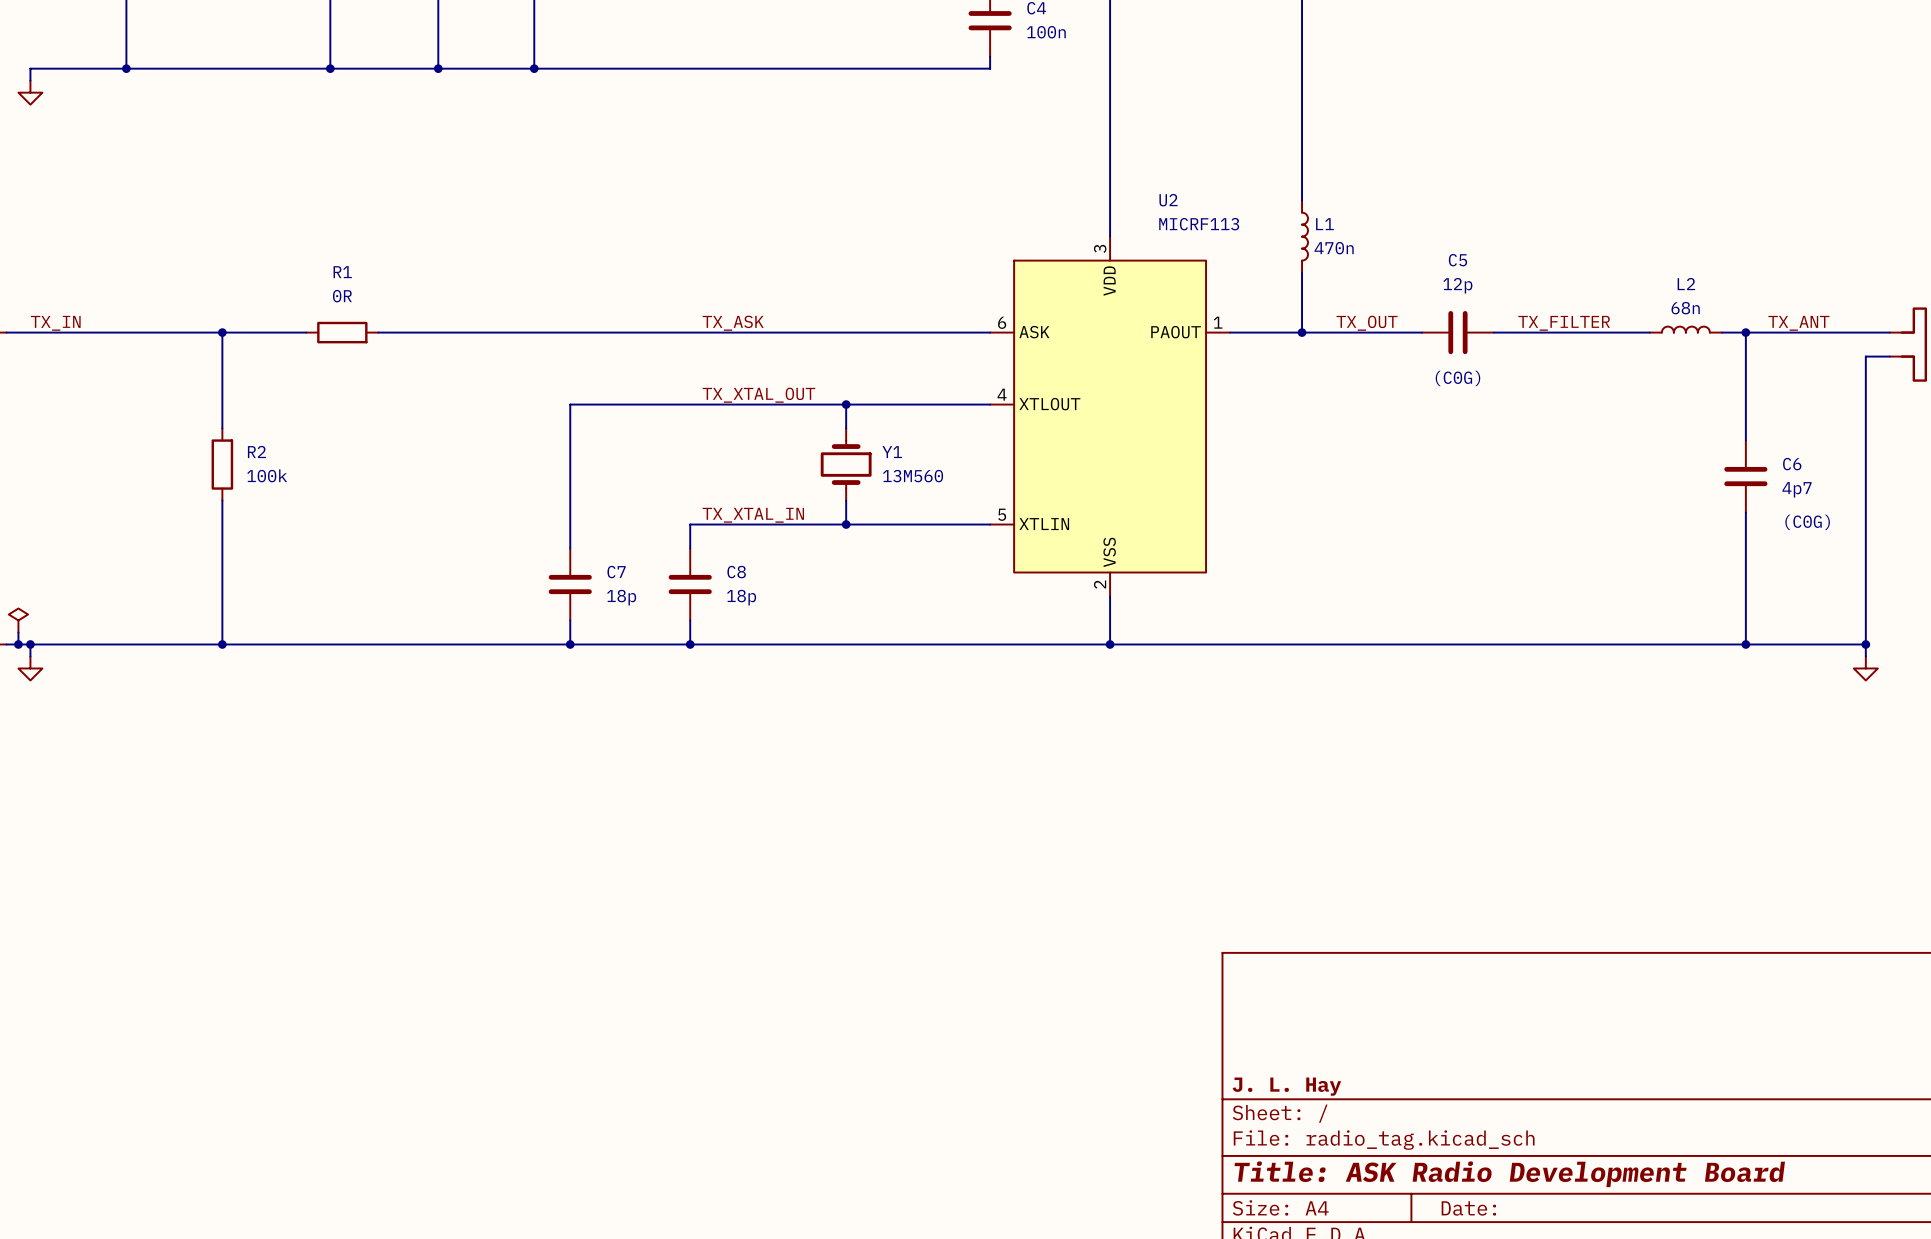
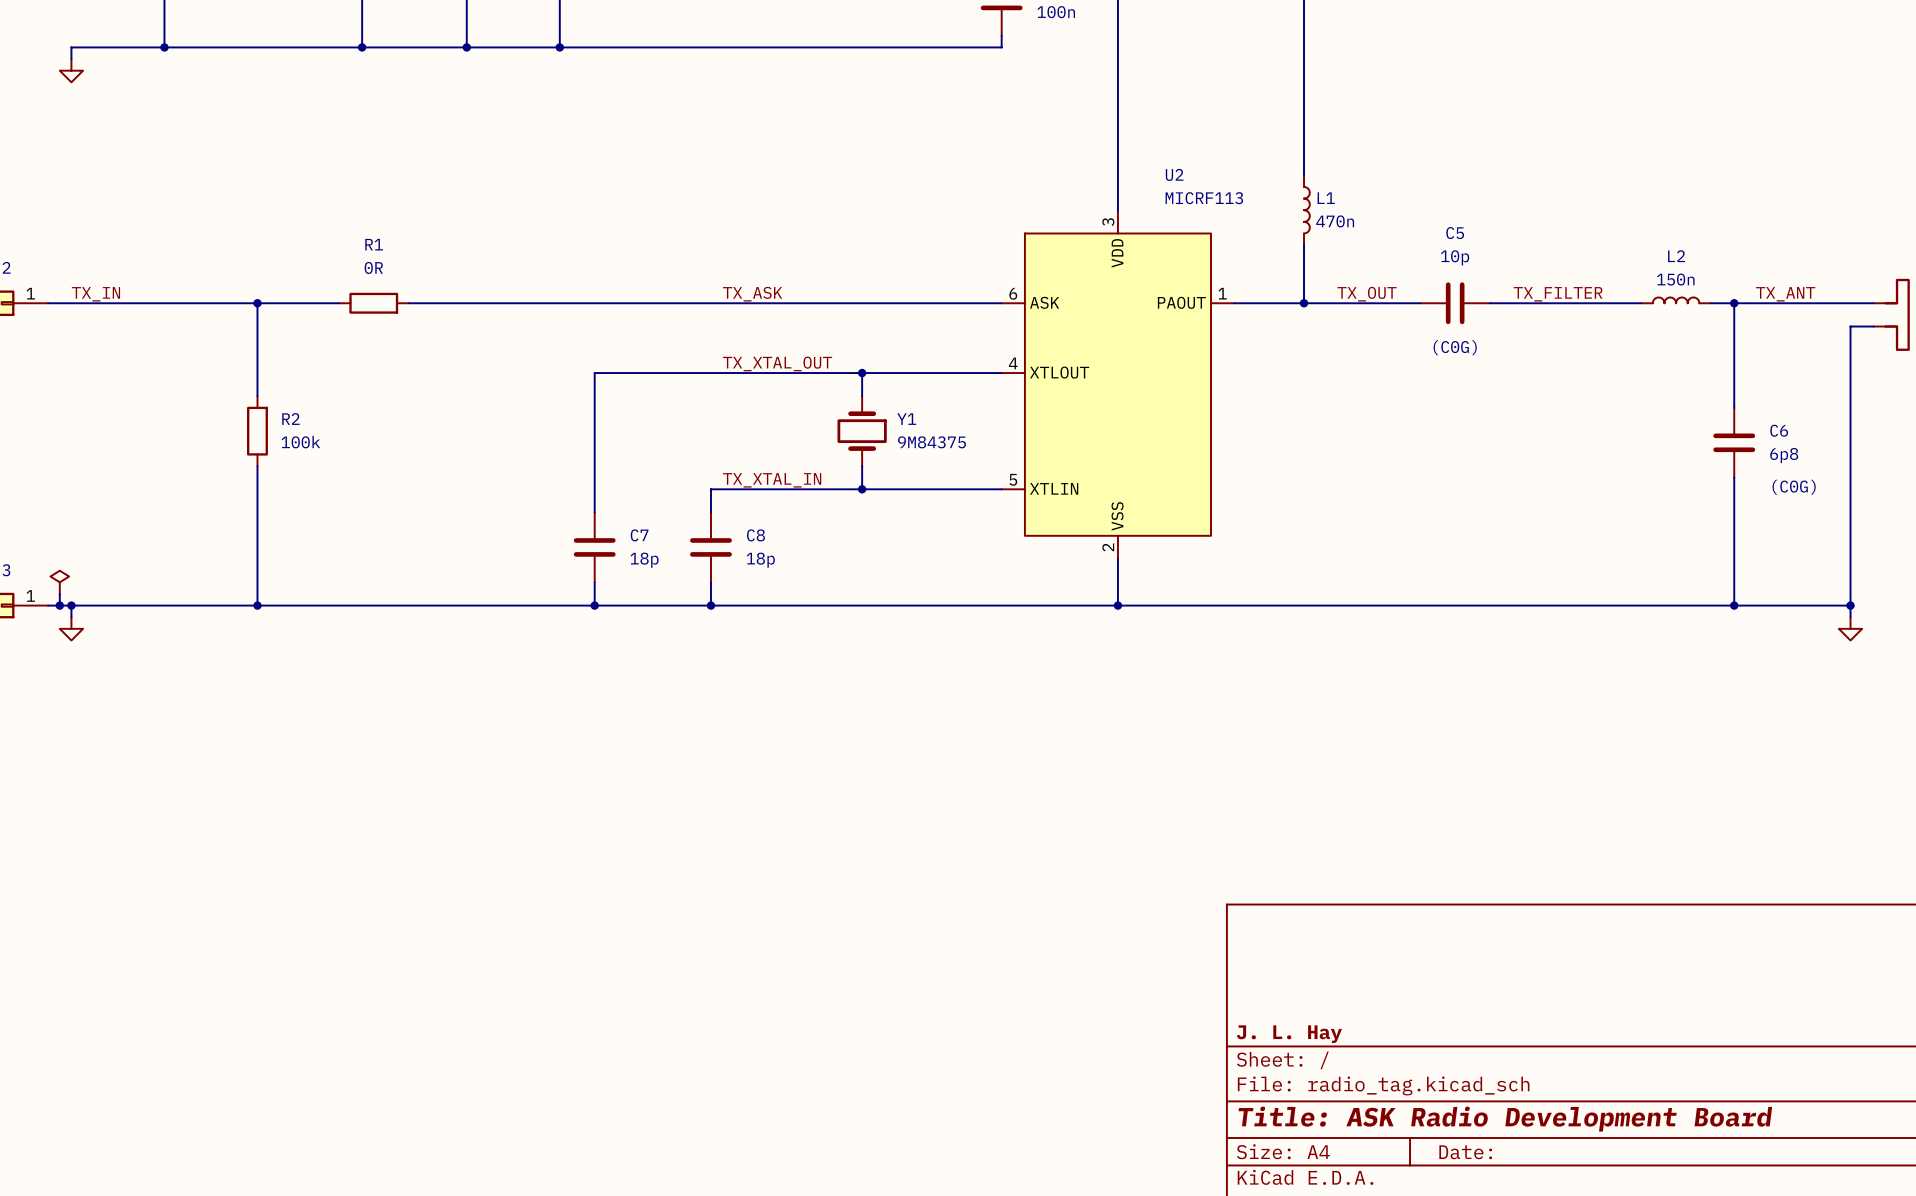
C5 value: 12p (1457, 285) -> 10p (1455, 257)
L2 value: 68n (1685, 308) -> 150n (1675, 279)
Y1 value: 13M560 (913, 476) -> 9M84375 (931, 442)
C6 value: 4p7 (1797, 489) -> 6p8 (1784, 455)

